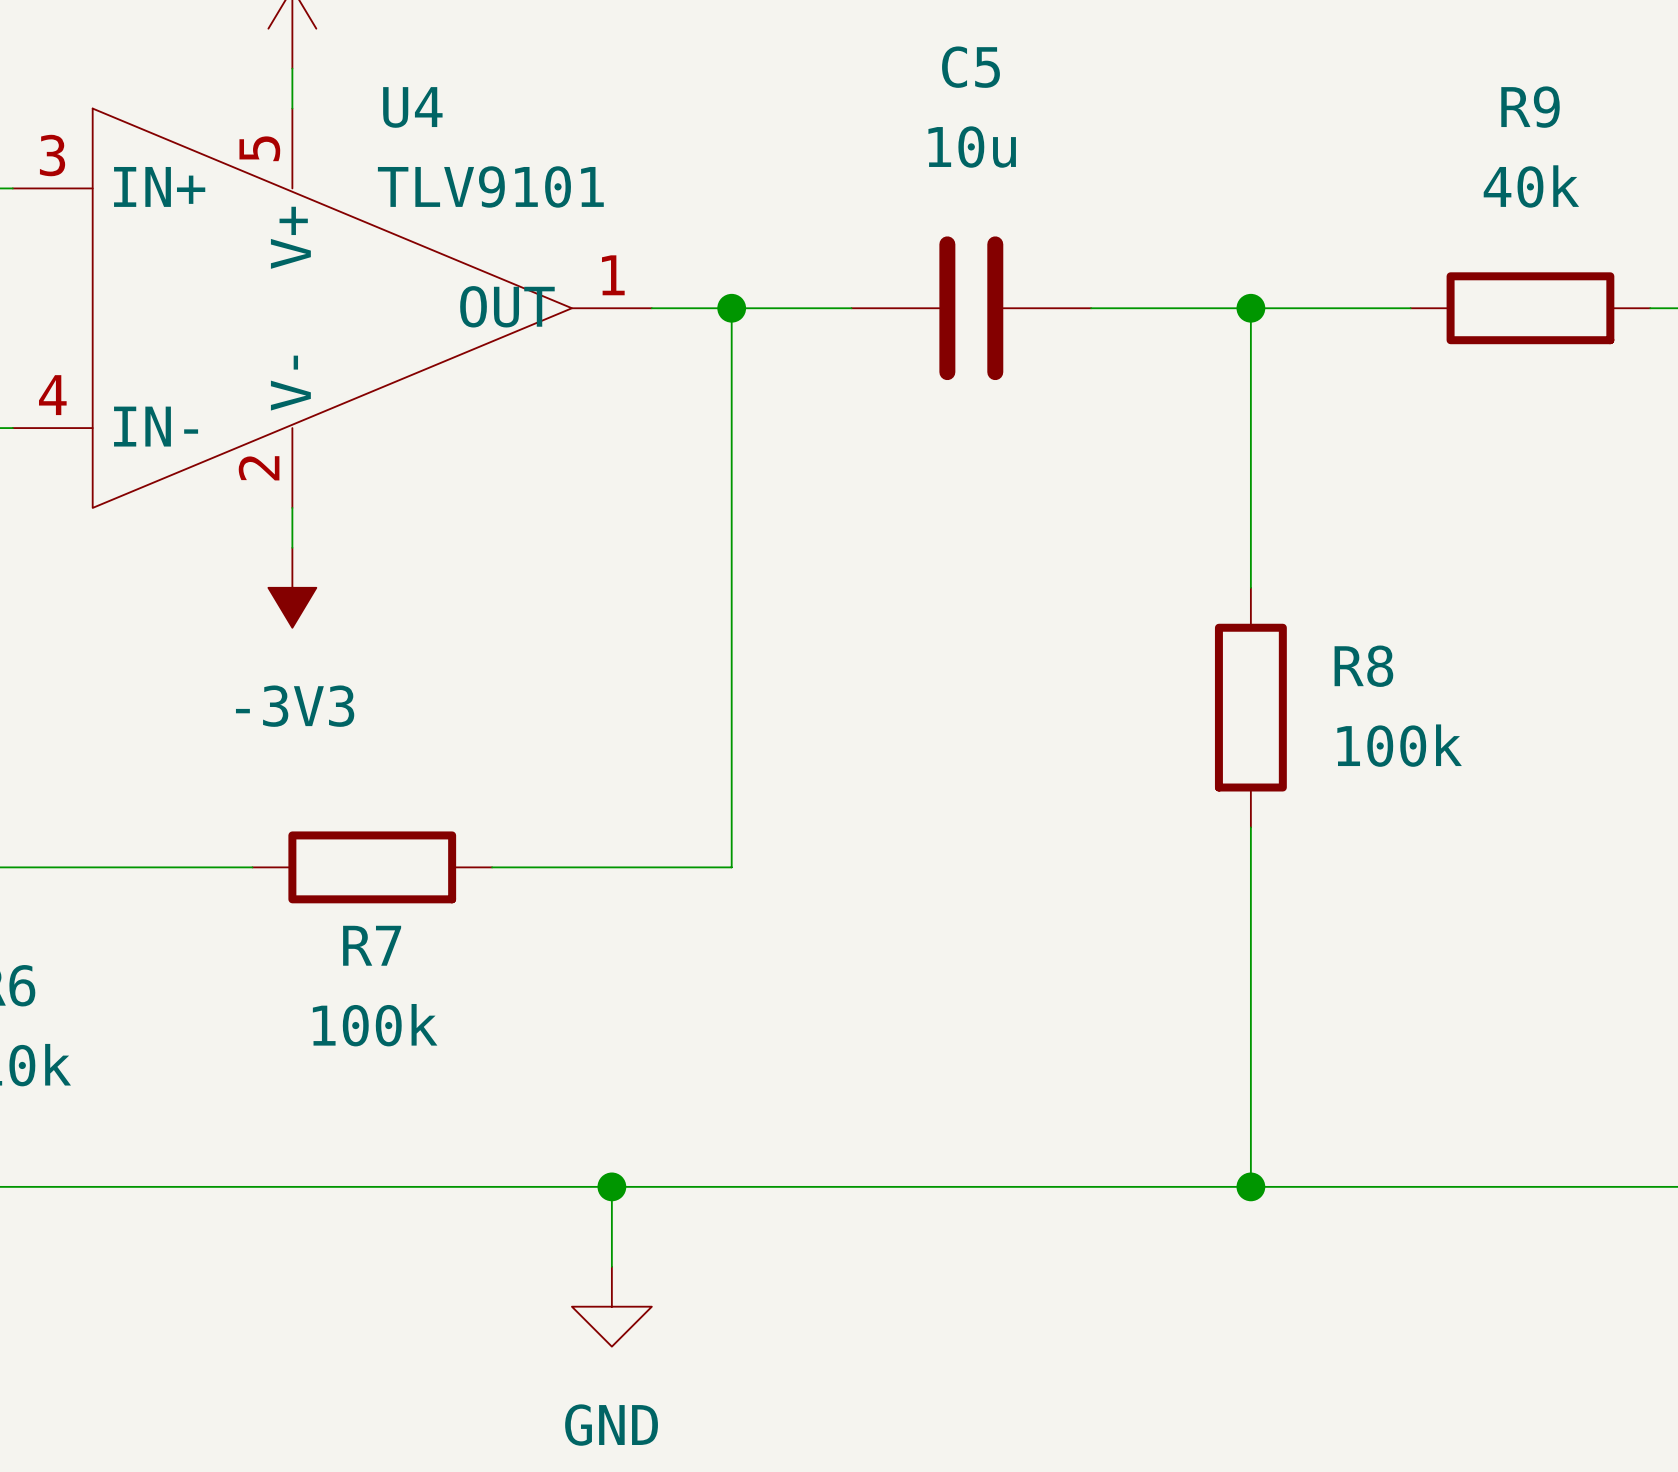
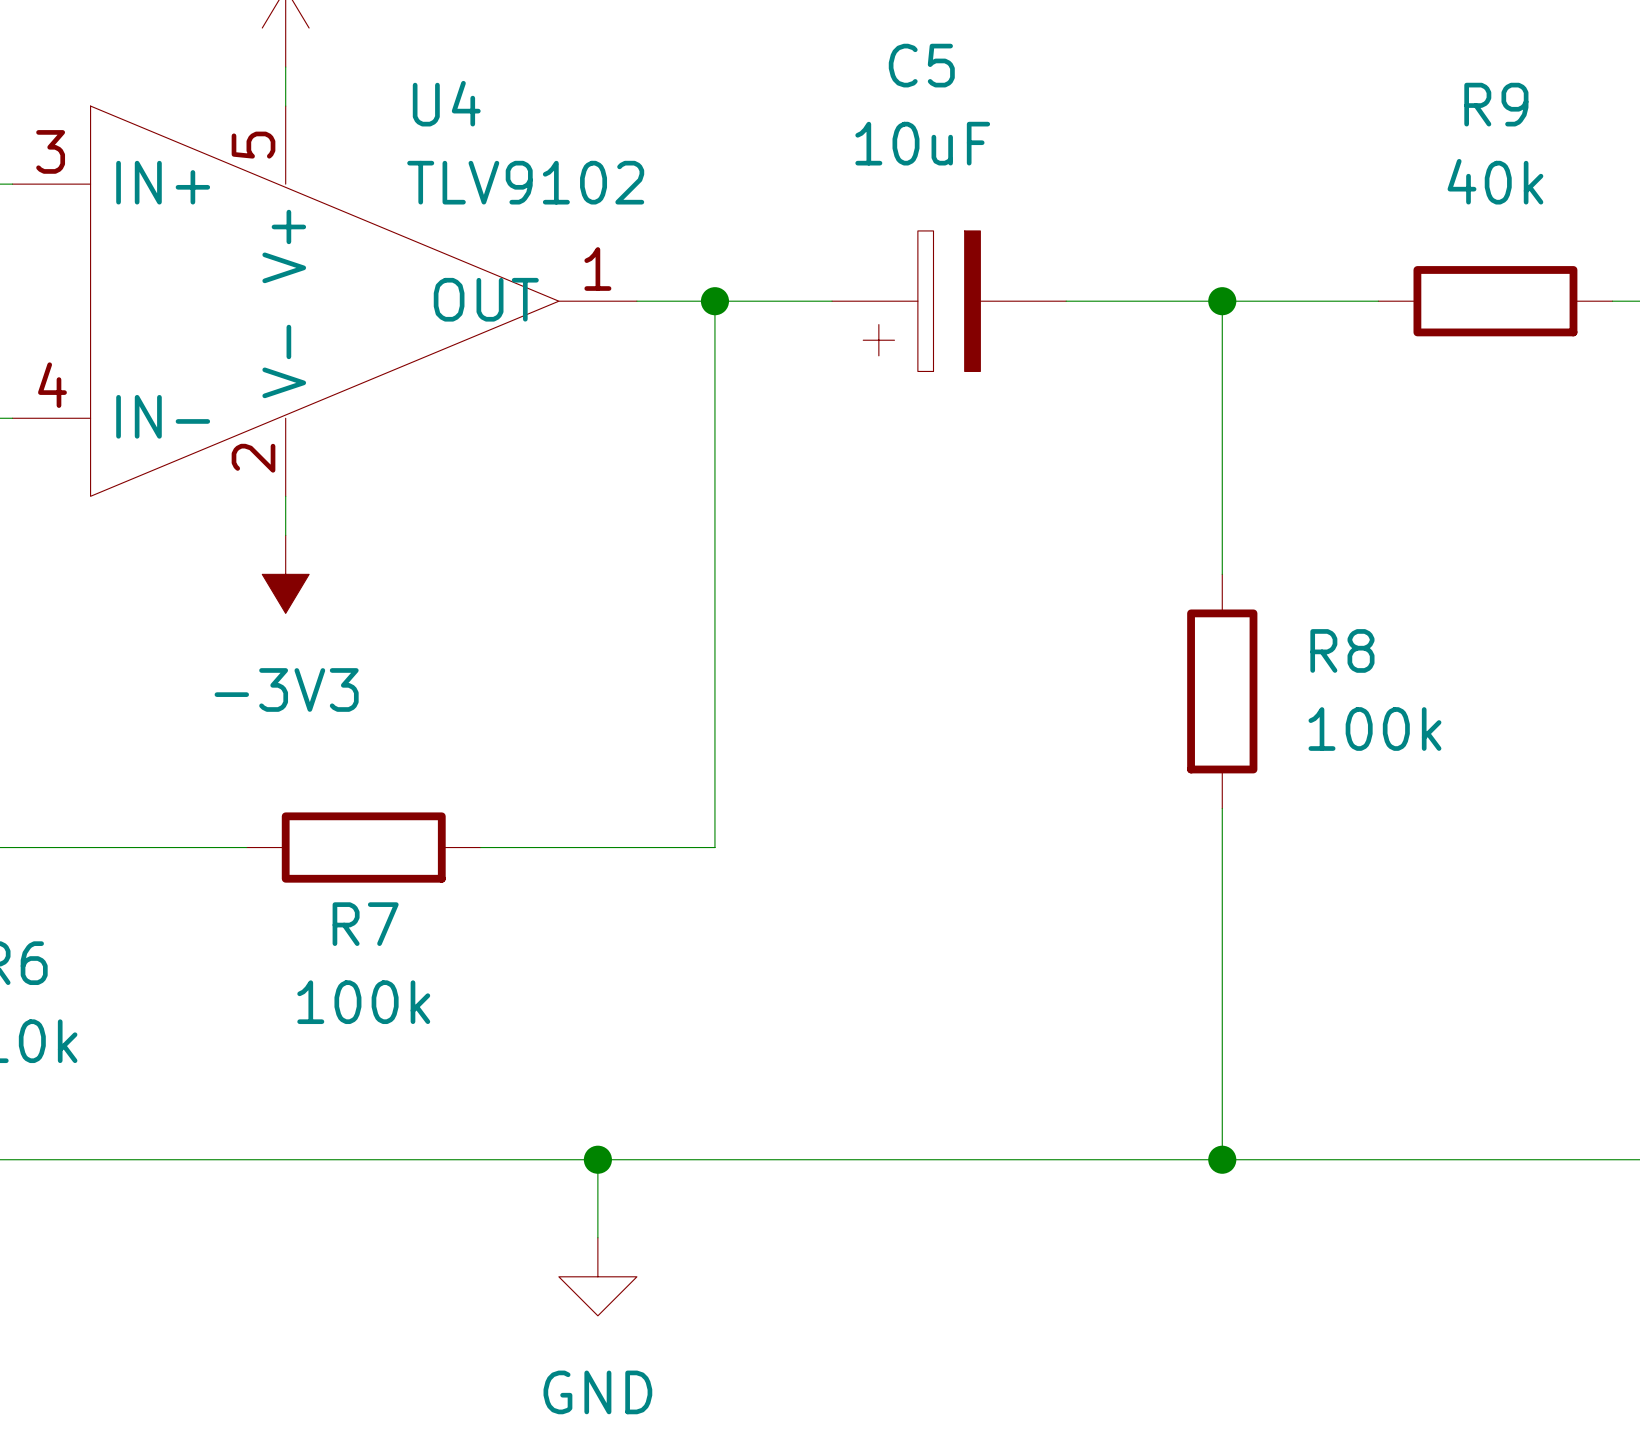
U4 name position: U4 (412, 107) -> U4 (446, 103)
C5 value: 10u (972, 147) -> 10uF (922, 143)
U4 value: TLV9101 (490, 186) -> TLV9102 (525, 182)
C5 symbol: [851, 236, 1092, 381] -> [832, 230, 1067, 372]

